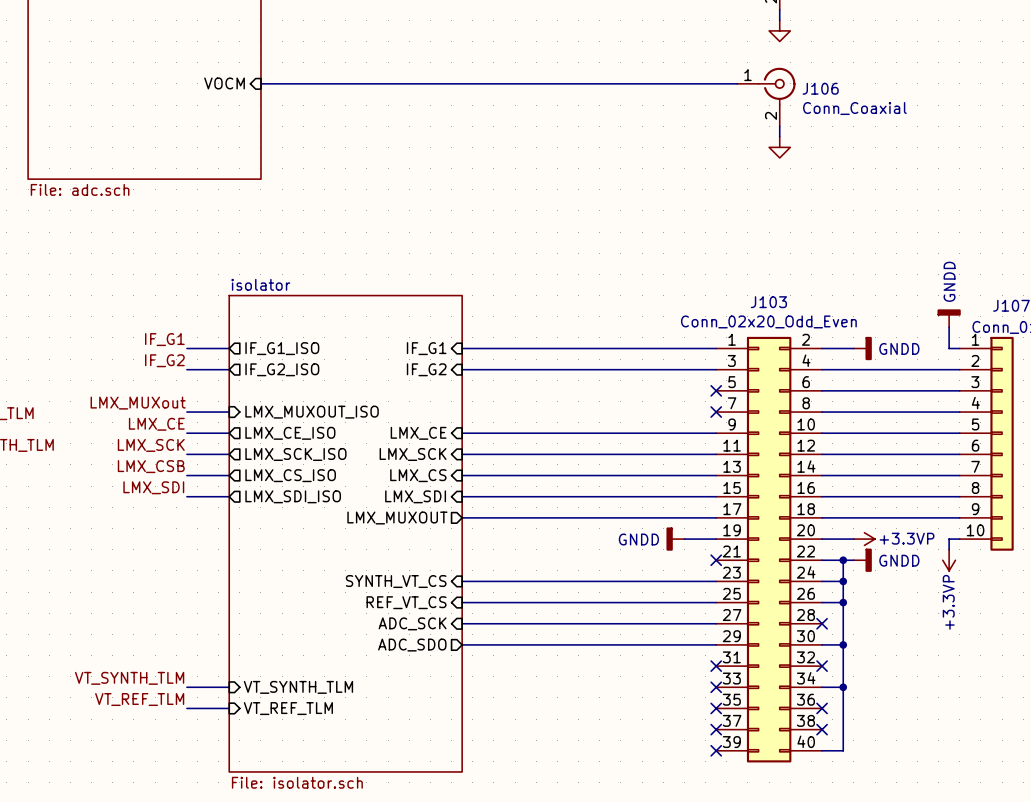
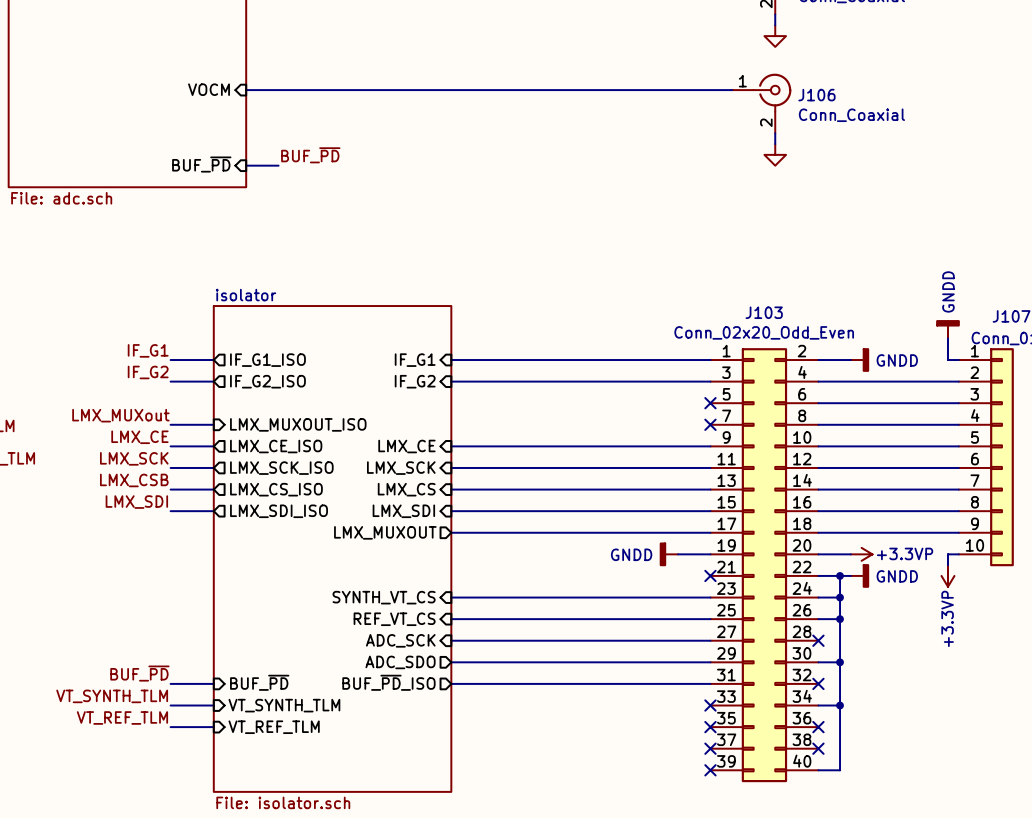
label: none -> BUF_~{PD} (310, 155)
sheet pin: none -> BUF_~{PD} (201, 164)
wire: none -> (246, 165) (278, 165)
label: none -> BUF_~{PD} (139, 673)
sheet pin: none -> BUF_~{PD} (259, 682)
sheet pin: none -> BUF_~{PD}_ISO (388, 682)
wire: none -> (170, 683) (213, 683)
wire: none -> (451, 683) (710, 683)
no-connect mark: (716, 666) -> none

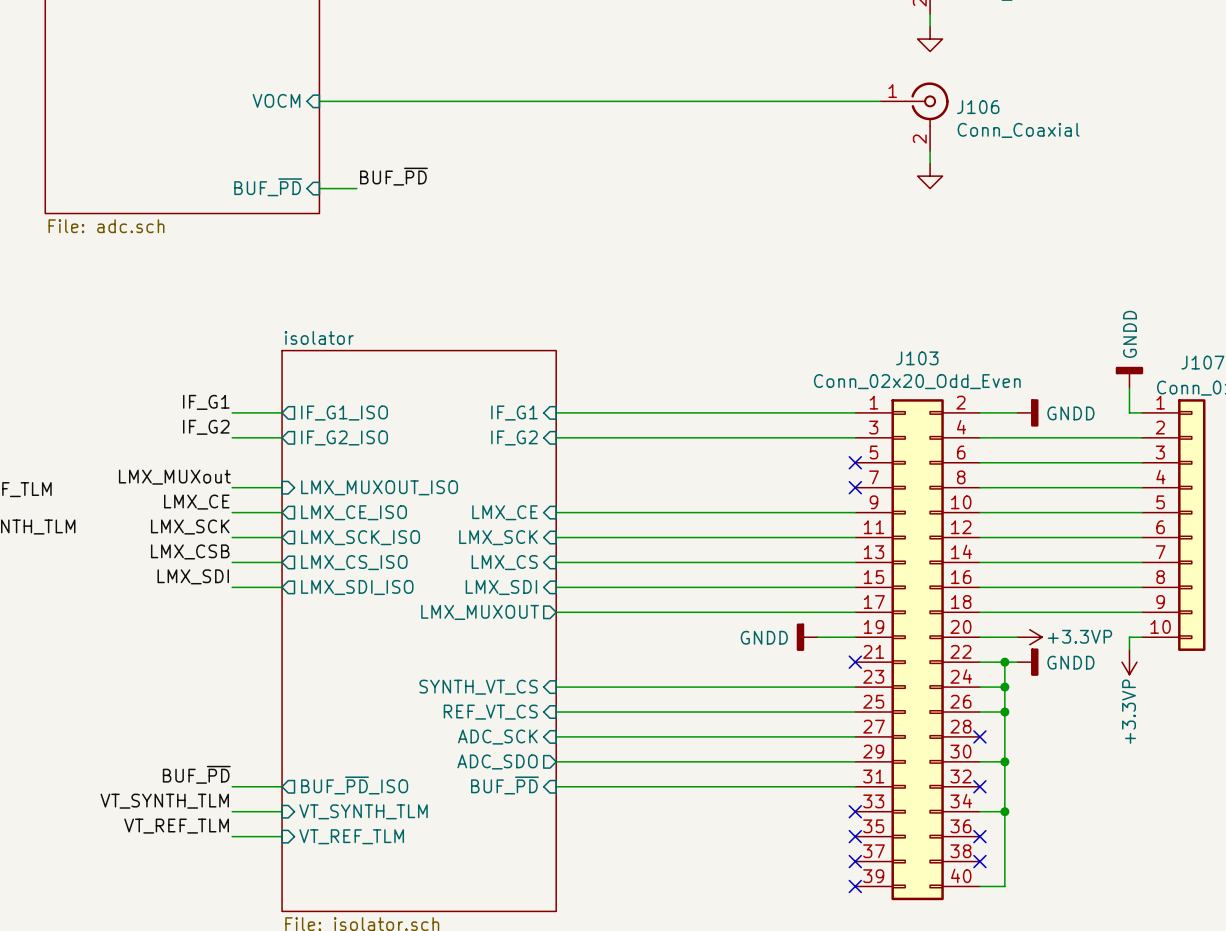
sheet pin shape: input (259, 682) -> output (354, 785)
sheet pin: BUF_~{PD} (259, 682) -> BUF_~{PD}_ISO (354, 785)
sheet pin shape: output (388, 682) -> input (504, 785)
sheet pin: BUF_~{PD}_ISO (388, 682) -> BUF_~{PD} (504, 785)

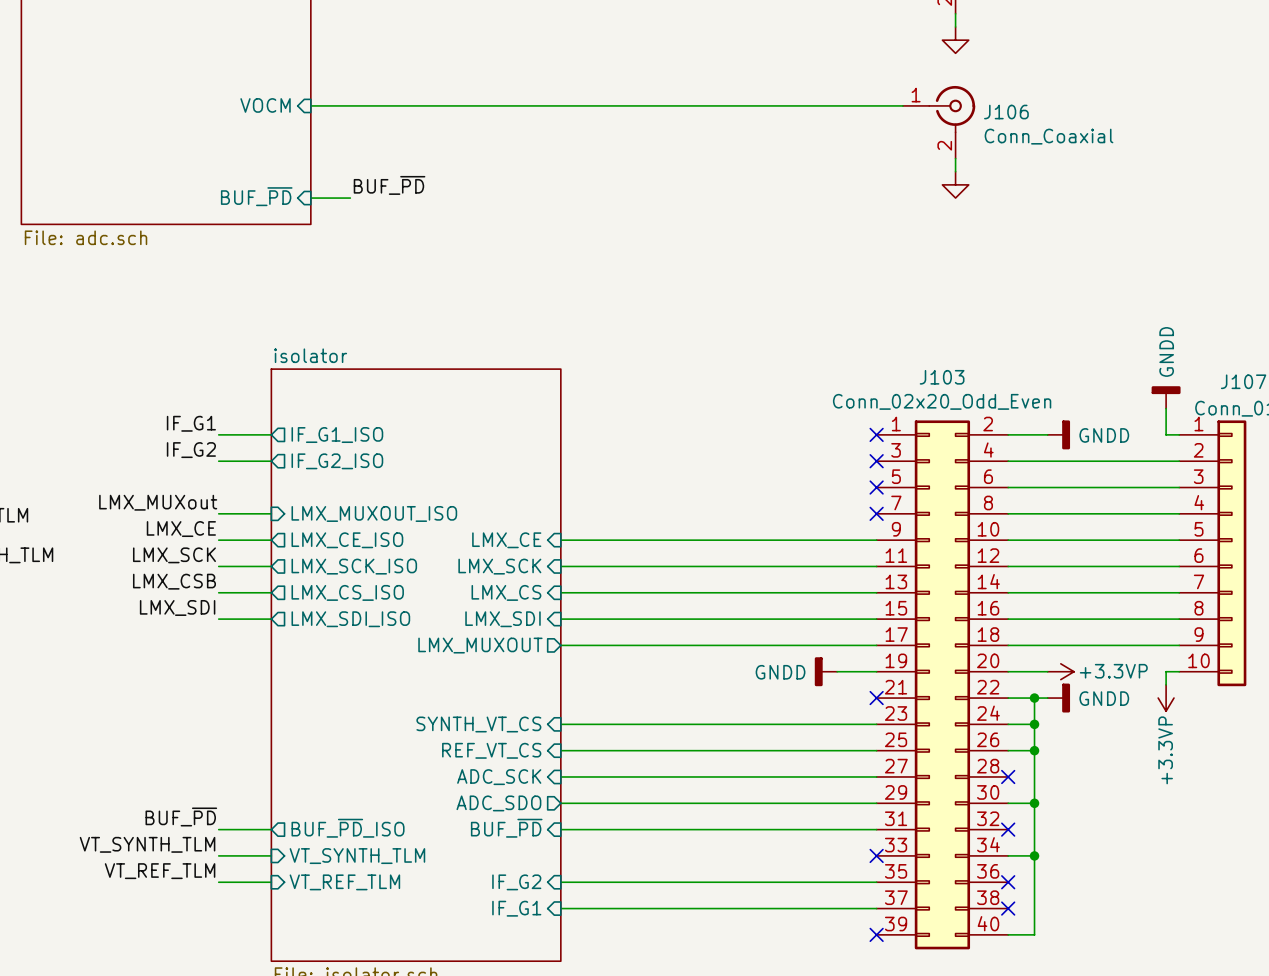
wire: (556, 412) (855, 412) -> none
no-connect mark: none -> (876, 434)
sheet pin: IF_G1 (514, 413) -> none
sheet pin: IF_G2 (514, 437) -> none
wire: (556, 437) (855, 437) -> none
no-connect mark: none -> (876, 461)
sheet pin: none -> IF_G2 (516, 882)
wire: none -> (560, 882) (876, 882)
no-connect mark: (855, 836) -> none
sheet pin: none -> IF_G1 (516, 908)
wire: none -> (560, 908) (876, 908)
no-connect mark: (855, 861) -> none

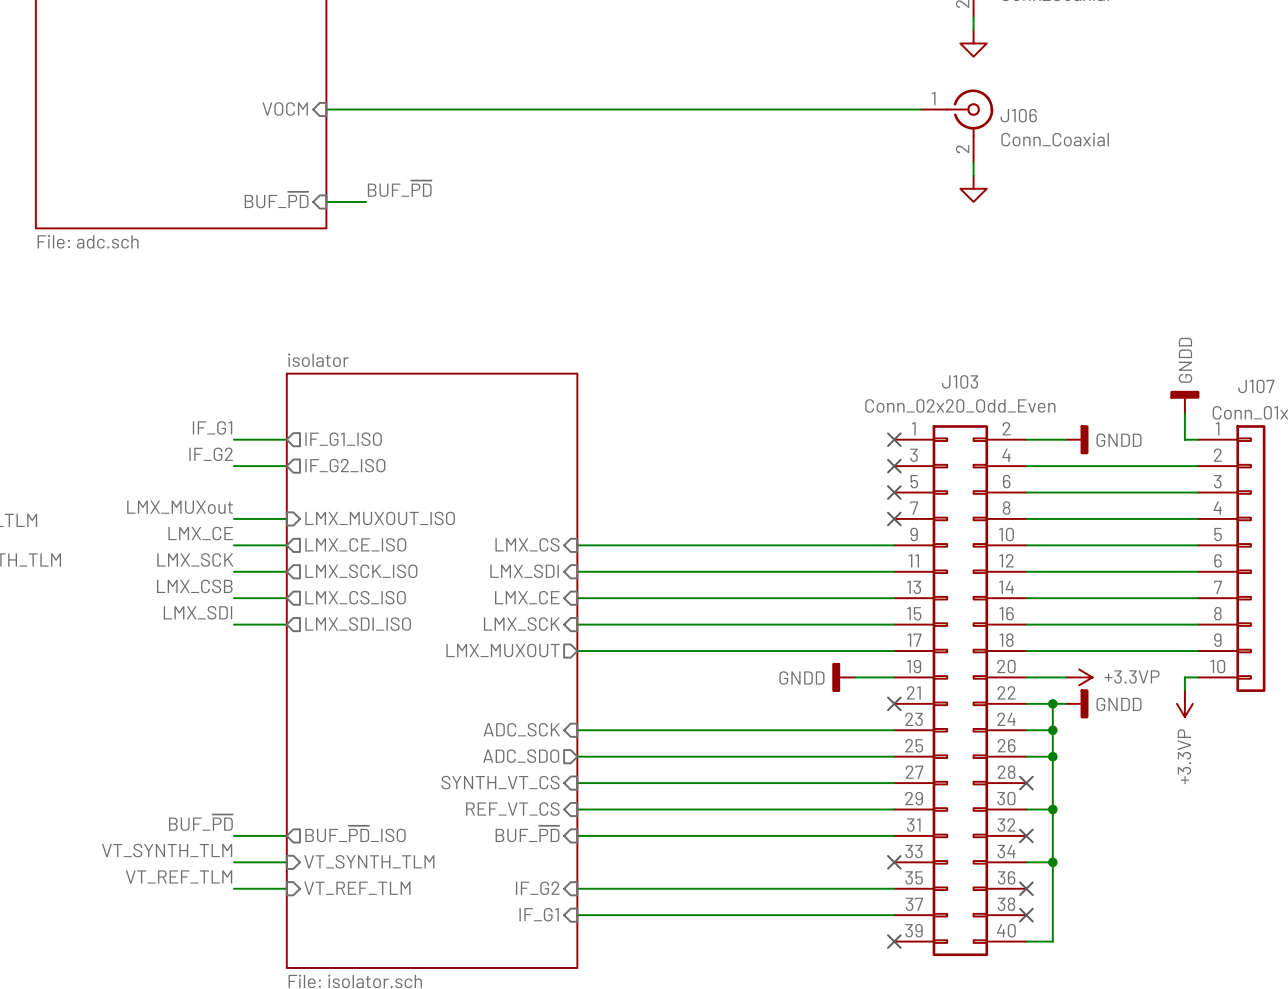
sheet pin: LMX_CE (506, 540) -> LMX_CS (527, 544)
sheet pin: LMX_SCK (499, 566) -> LMX_SDI (524, 571)
sheet pin: LMX_CS (506, 592) -> LMX_CE (527, 597)
sheet pin: LMX_SDI (502, 619) -> LMX_SCK (521, 624)
sheet pin: SYNTH_VT_CS (478, 724) -> ADC_SCK (521, 729)
sheet pin shape: input (491, 750) -> output (521, 756)
sheet pin: REF_VT_CS (491, 750) -> ADC_SDO (521, 756)
sheet pin: ADC_SCK (499, 777) -> SYNTH_VT_CS (500, 782)
sheet pin shape: output (498, 803) -> input (512, 809)
sheet pin: ADC_SDO (498, 803) -> REF_VT_CS (512, 809)

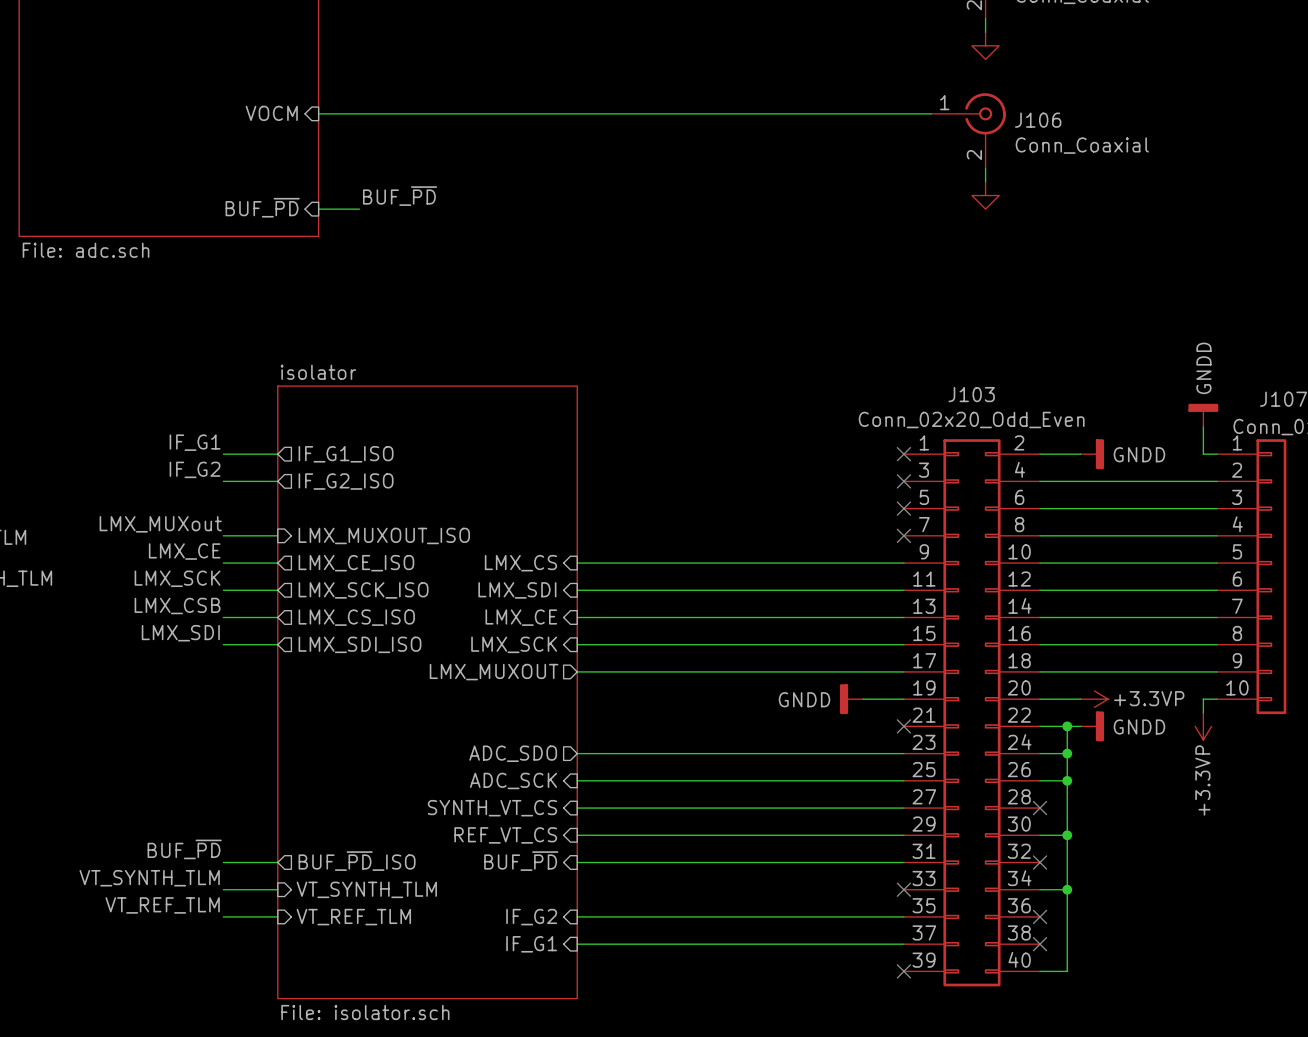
sheet pin shape: input (521, 729) -> output (513, 753)
sheet pin: ADC_SCK (521, 729) -> ADC_SDO (513, 753)
sheet pin shape: output (521, 756) -> input (513, 780)
sheet pin: ADC_SDO (521, 756) -> ADC_SCK (513, 780)

